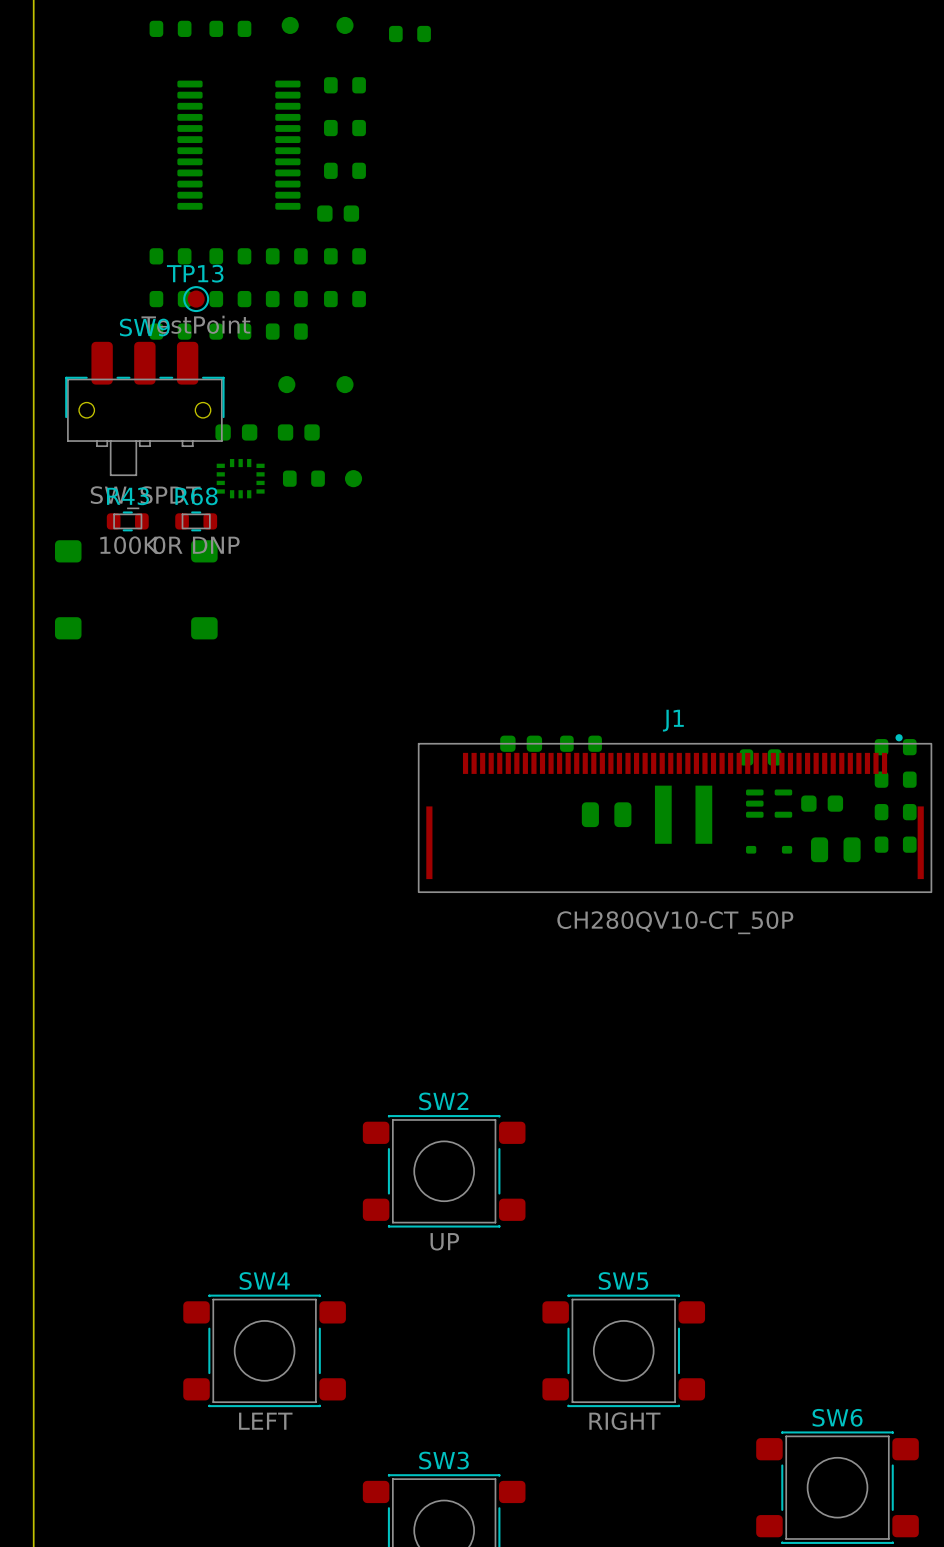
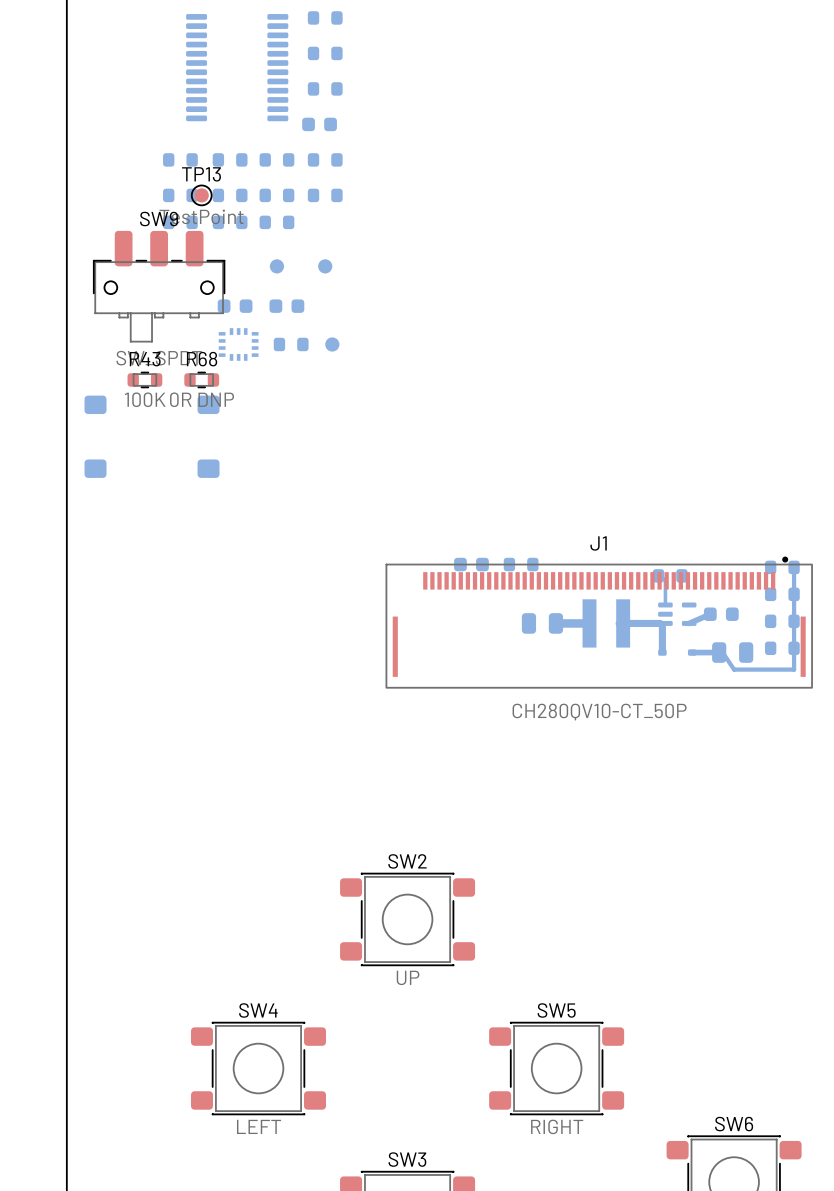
bottom track: none -> (794, 564) (794, 669) (734, 669) (722, 652)
bottom track: none -> (665, 578) (665, 604)
bottom track: none -> (710, 614) (689, 623)
bottom track: none -> (556, 623) (585, 623)
bottom track: none -> (619, 623) (660, 623)
bottom track: none -> (662, 625) (662, 649)
bottom track: none -> (692, 652) (715, 652)

